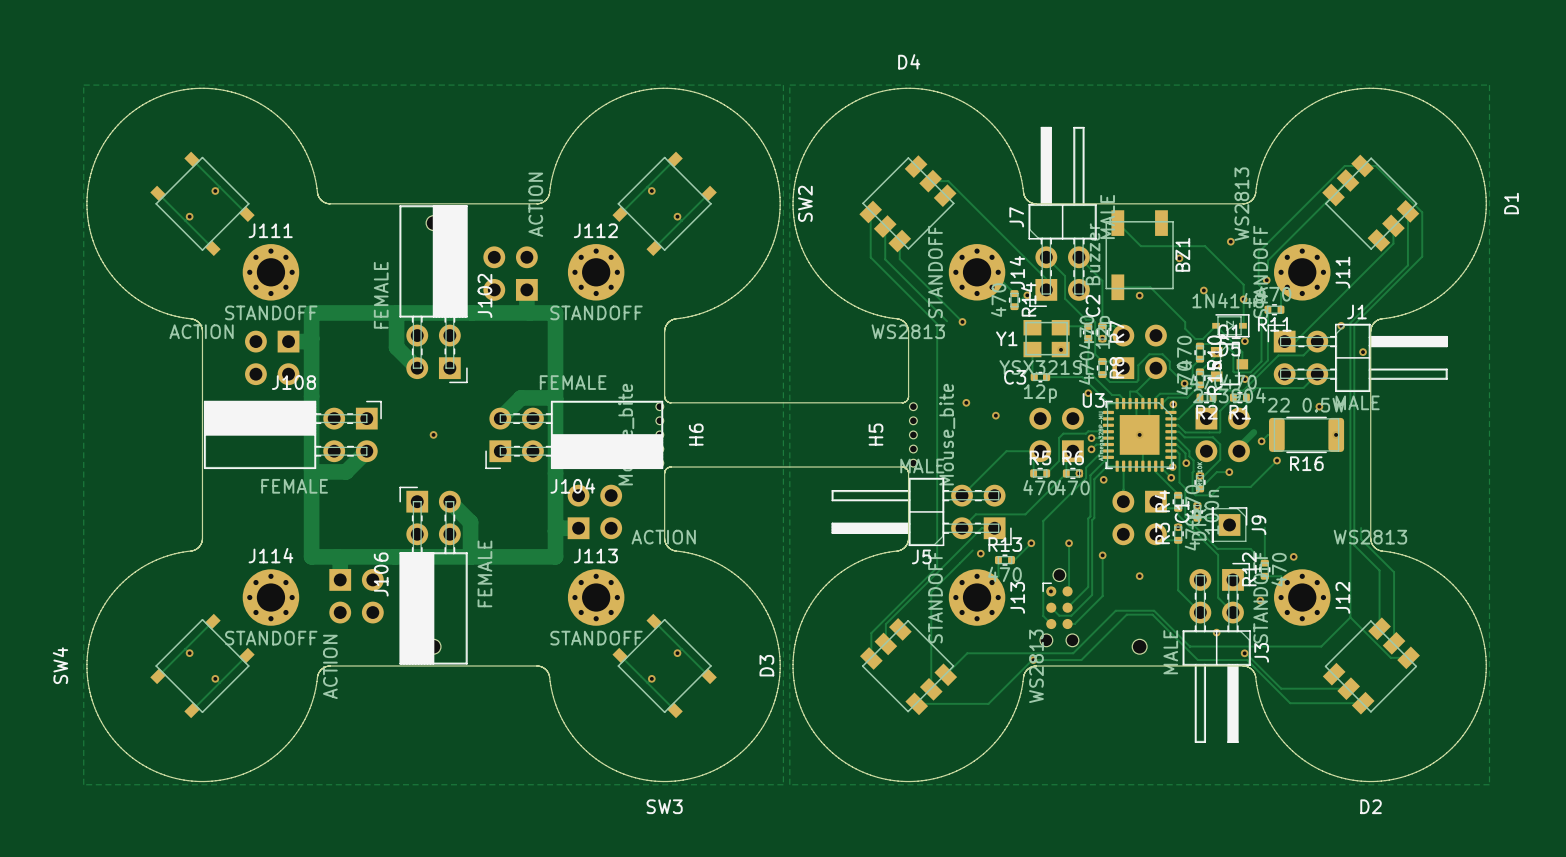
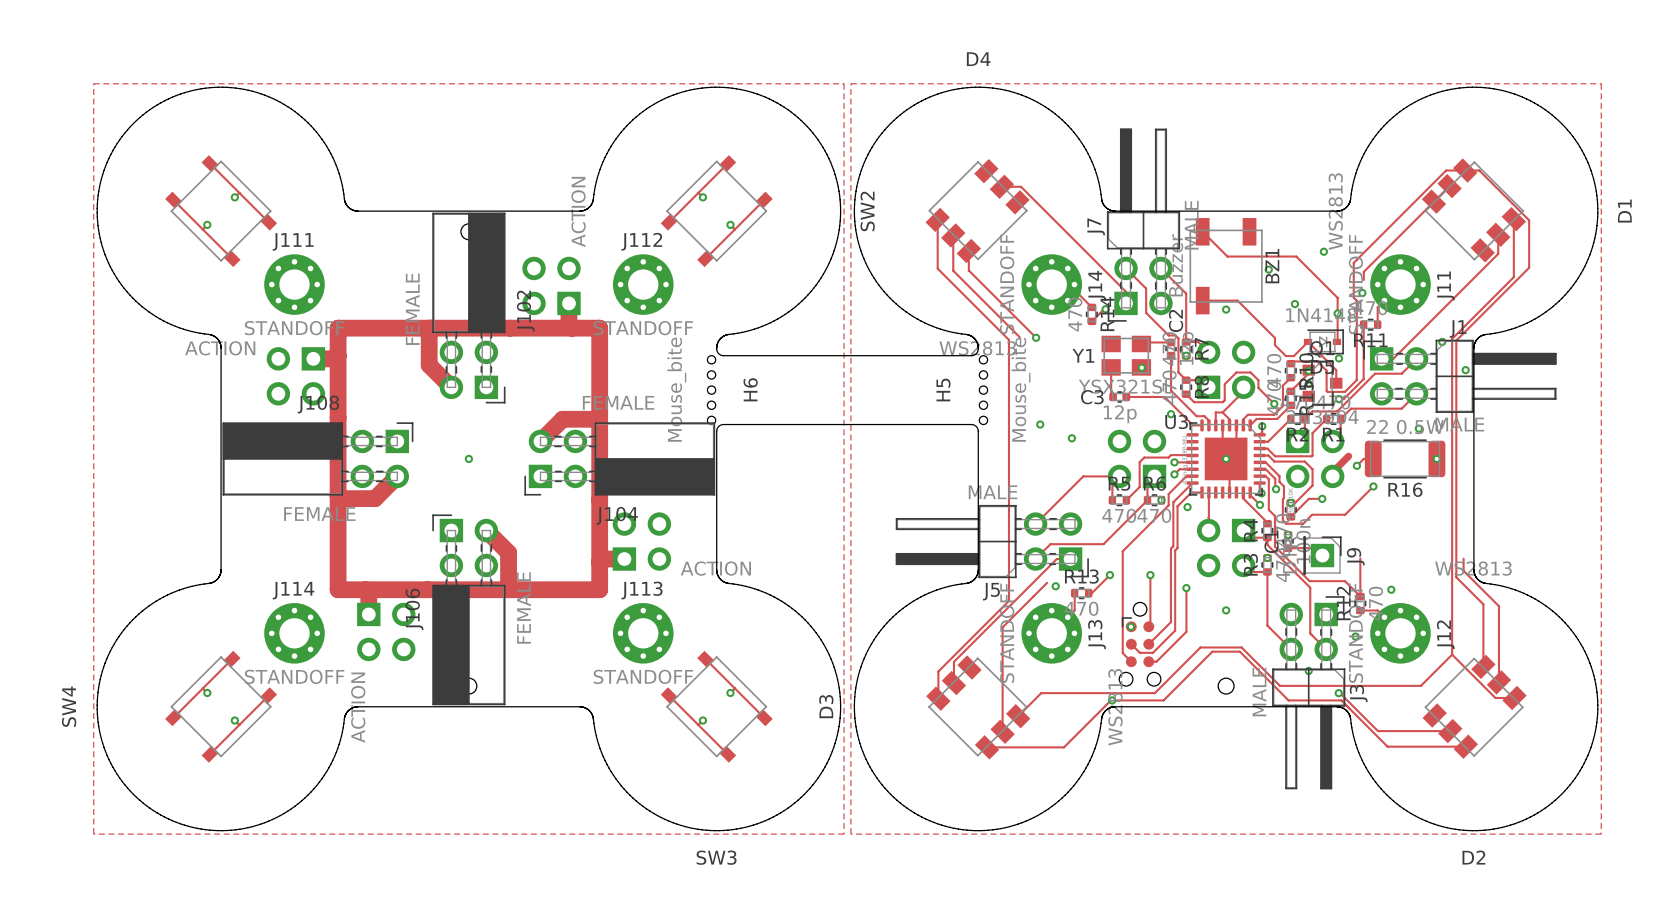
board edge: (664, 332) (664, 396) -> (716, 348) (718, 353) (723, 355) (971, 355) (976, 353) (978, 348)
board edge: (908, 332) (908, 396) -> none
board edge: none -> (723, 424) (719, 425) (716, 430) (716, 500)
board edge: none -> (971, 424) (975, 425) (978, 430) (978, 500)
H6 position: (659, 434) -> (711, 390)
H5 position: (913, 434) -> (983, 390)
board edge: (671, 467) (902, 467) -> none

